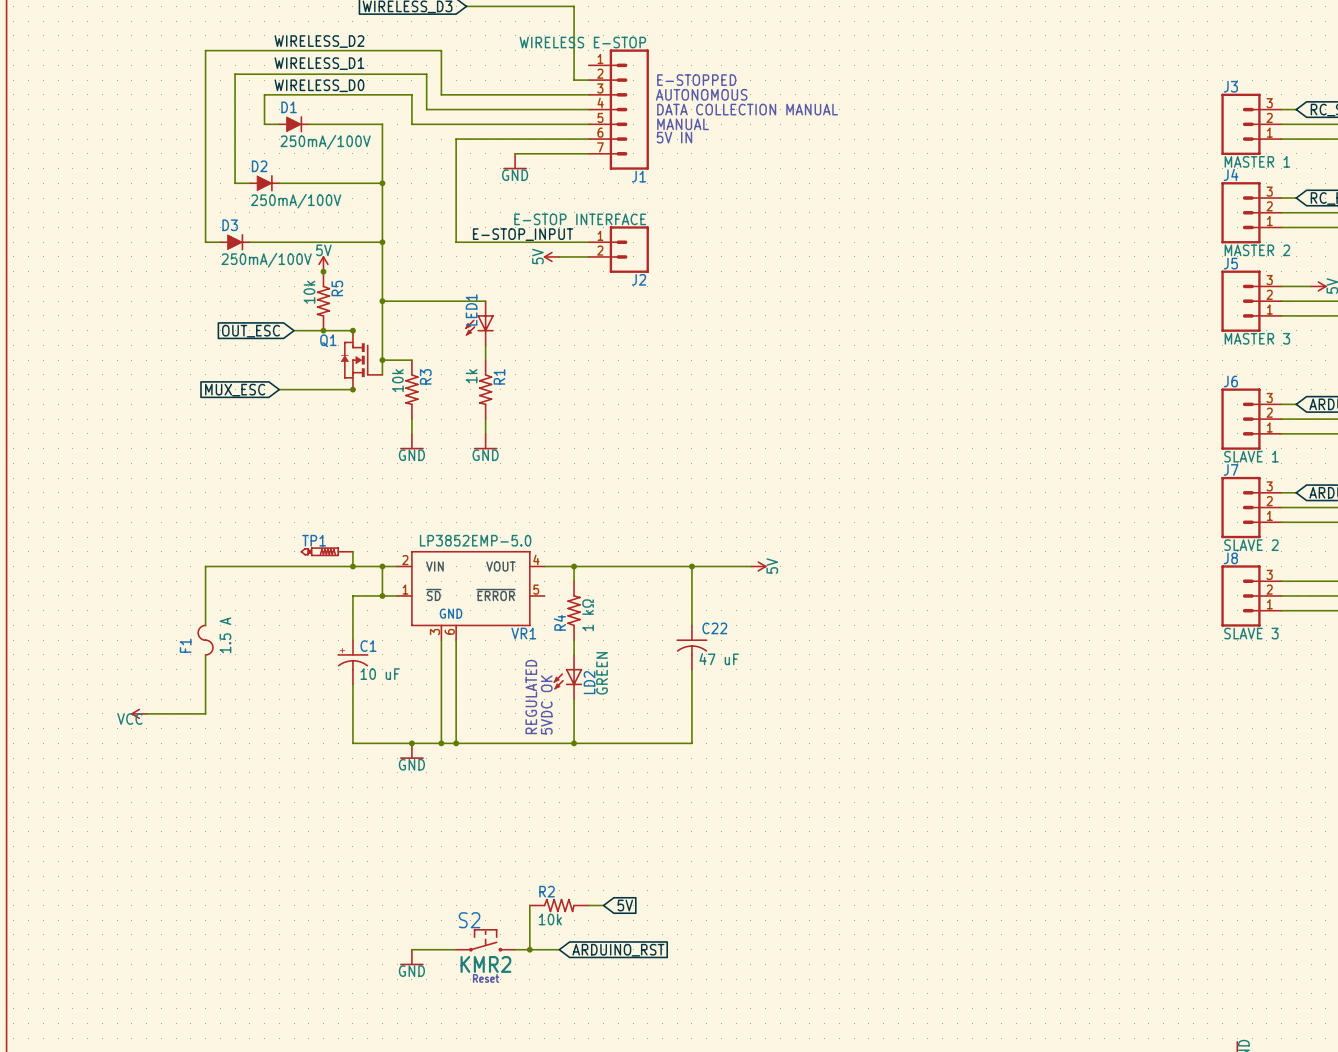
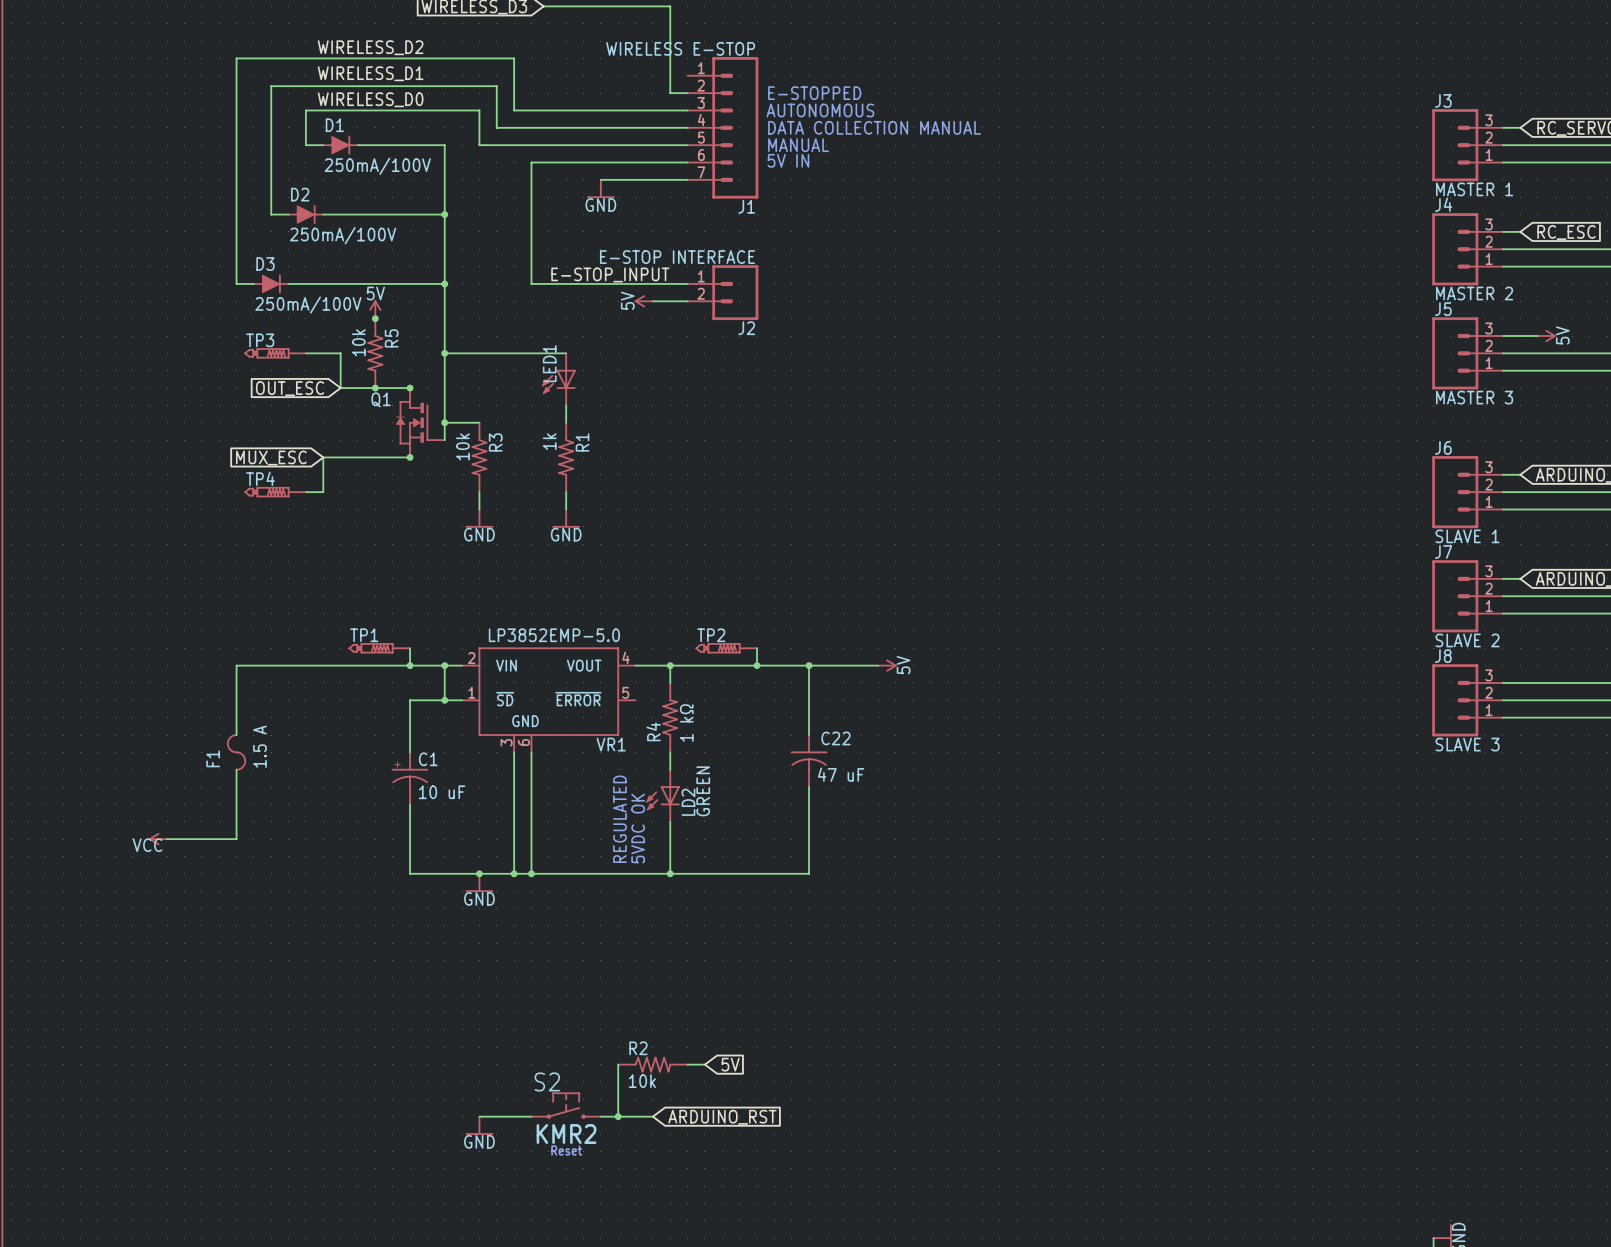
TP3: none -> (275, 353)
wire: none -> (305, 353) (340, 353) (340, 388)
wire: none -> (323, 457) (323, 492) (305, 492)
TP4: none -> (275, 492)
TP2: none -> (726, 648)
wire: none -> (757, 648) (757, 665)
junction: none -> (757, 665)

